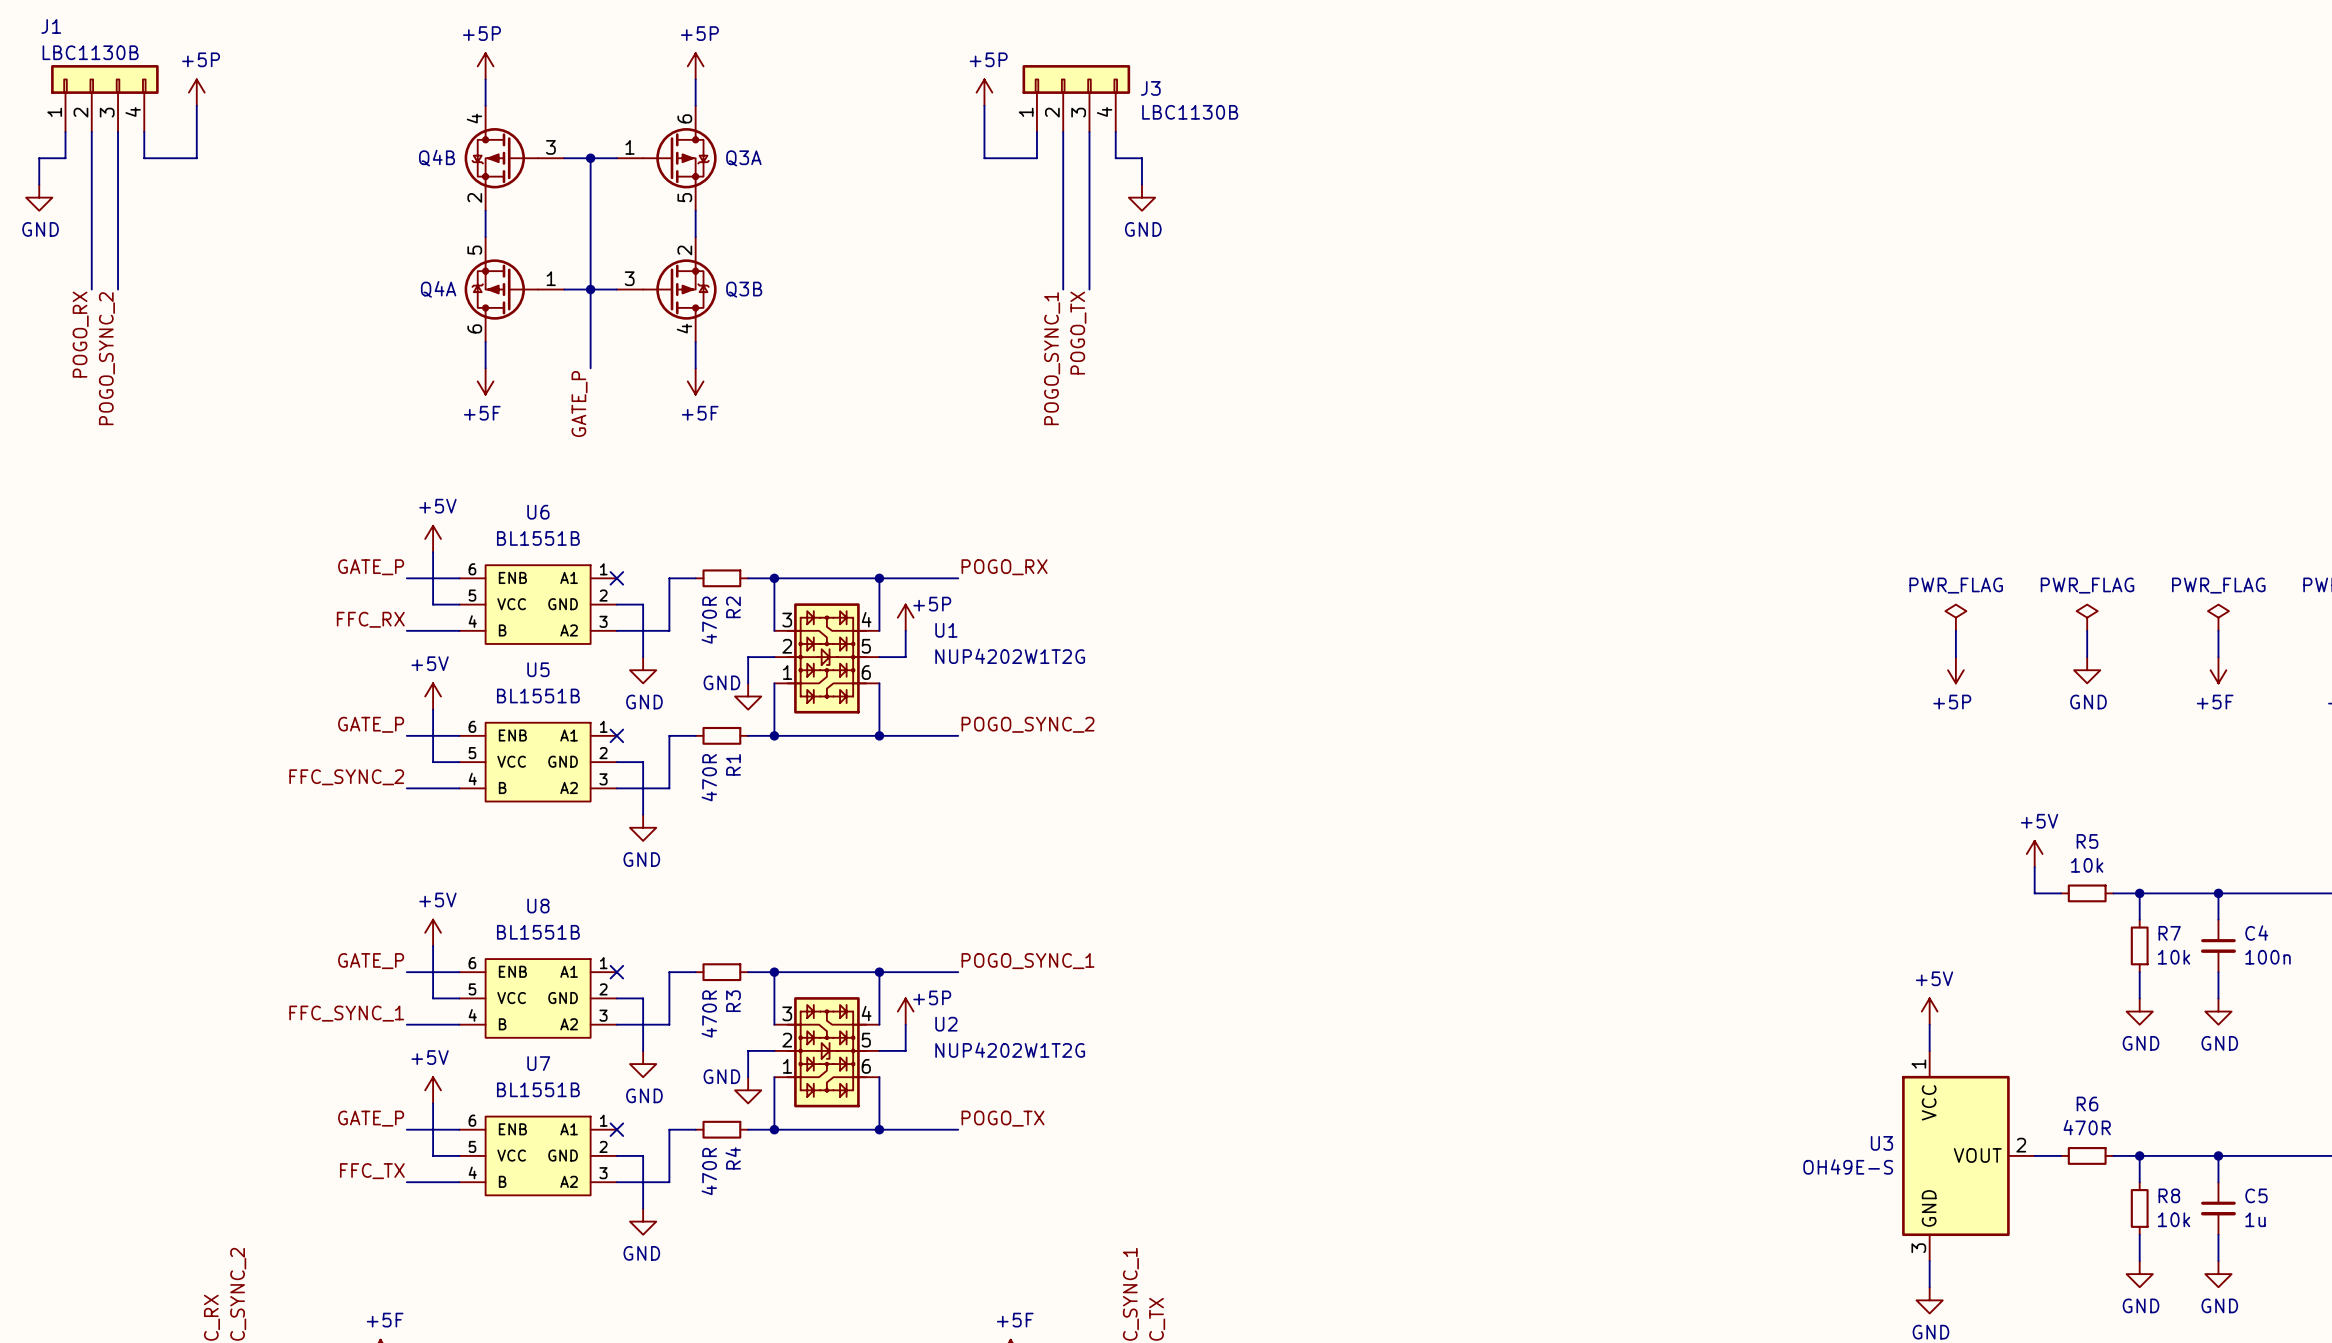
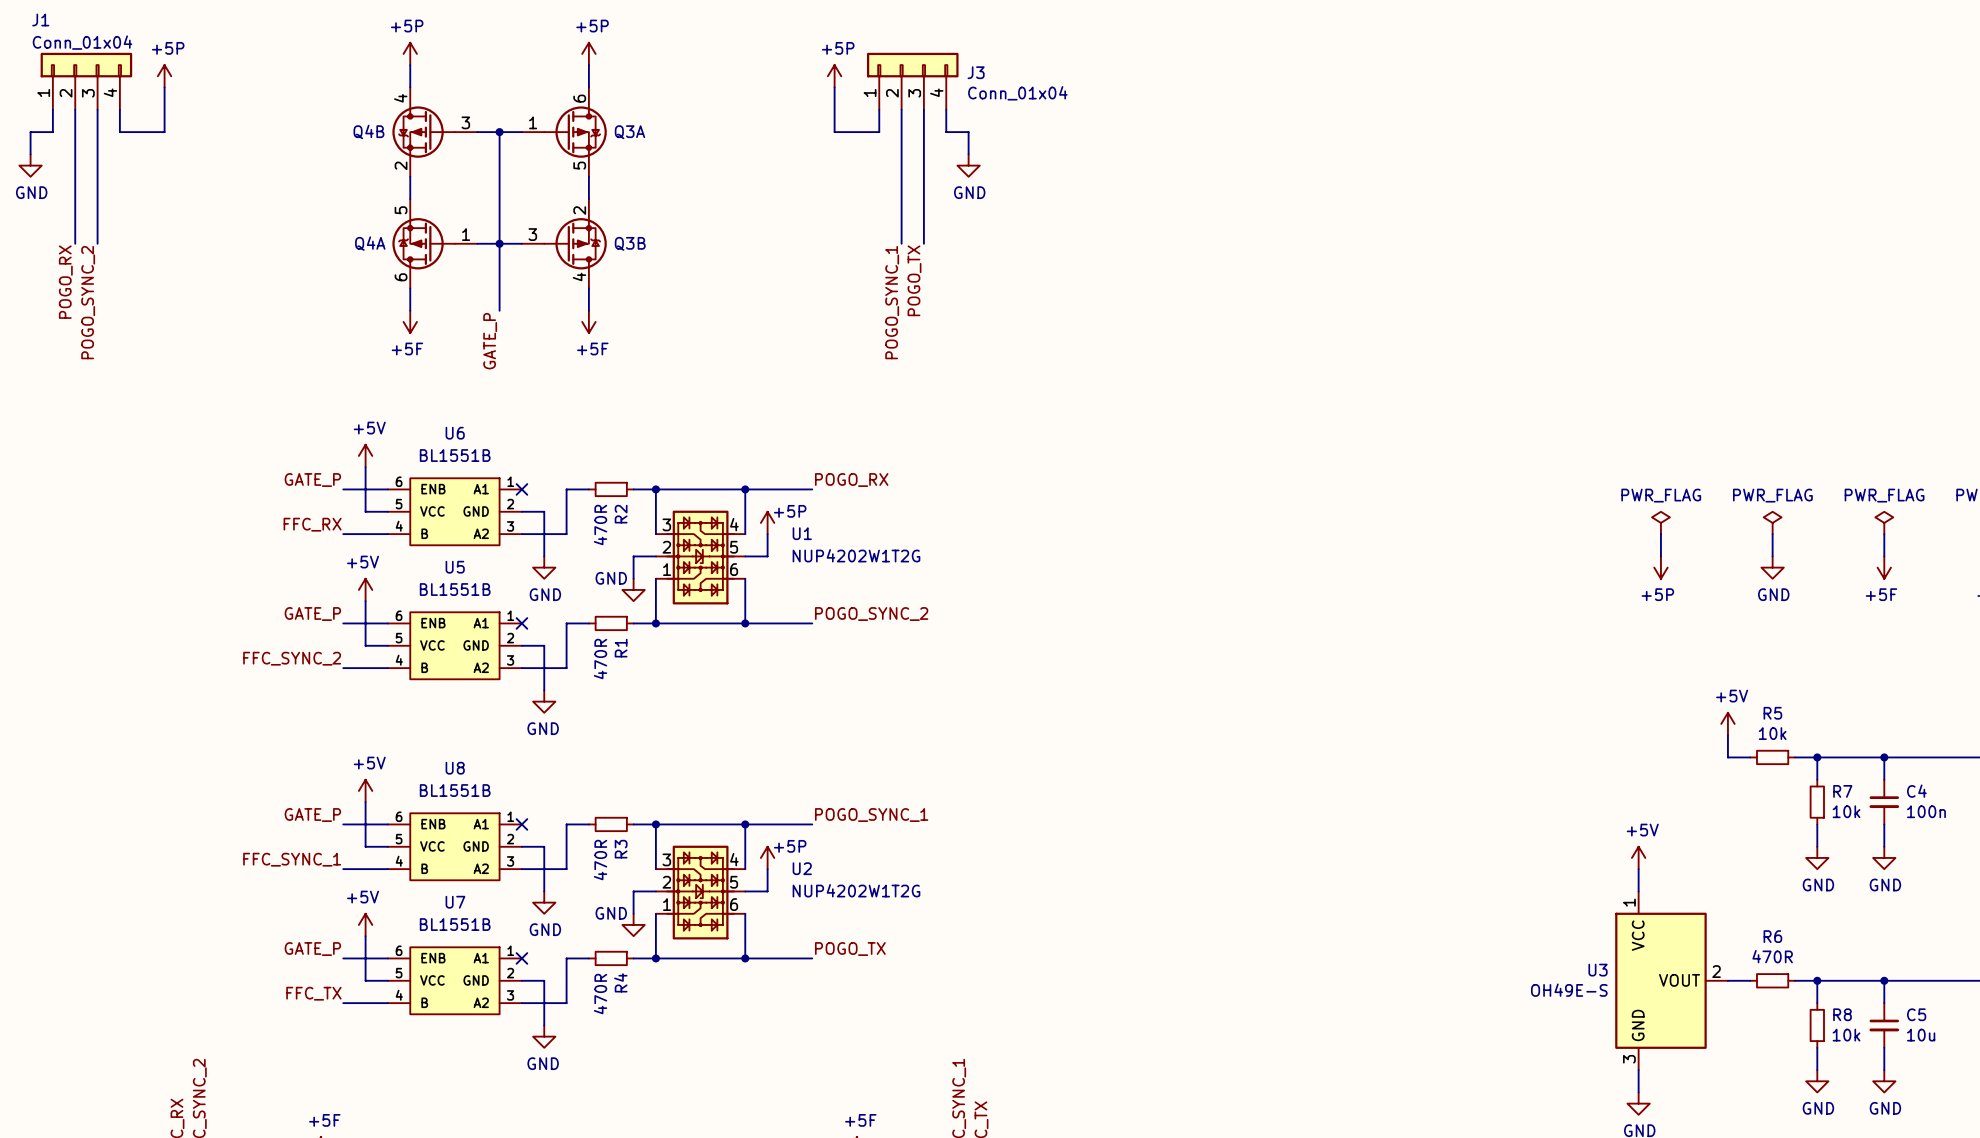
J1 value: LBC1130B (90, 52) -> Conn_01x04 (82, 42)
J3 value: LBC1130B (1190, 112) -> Conn_01x04 (1017, 93)
C5 value: 1u (2255, 1219) -> 10u (1921, 1035)

